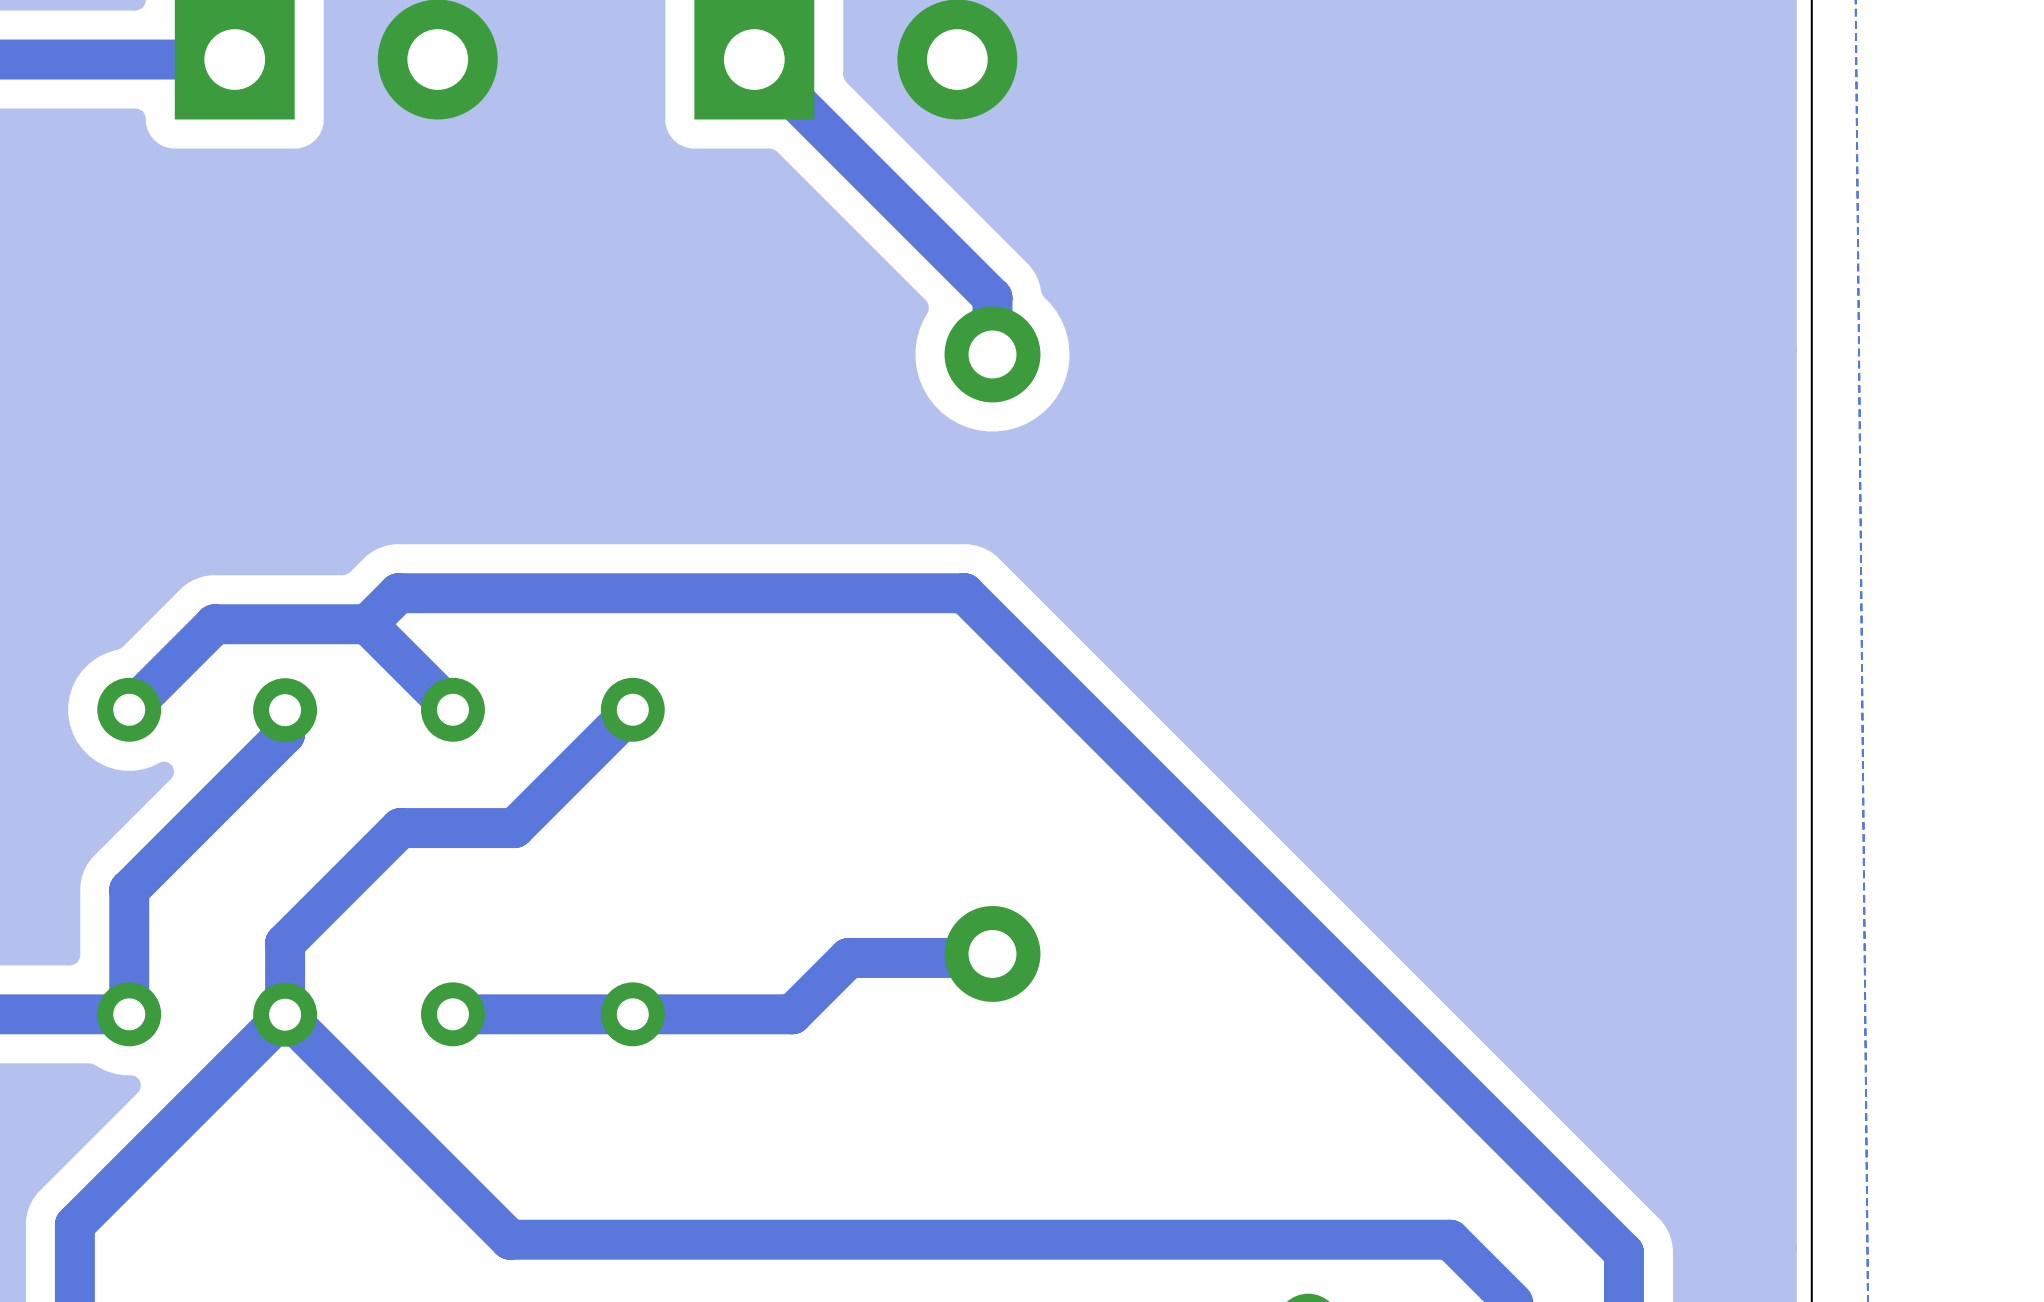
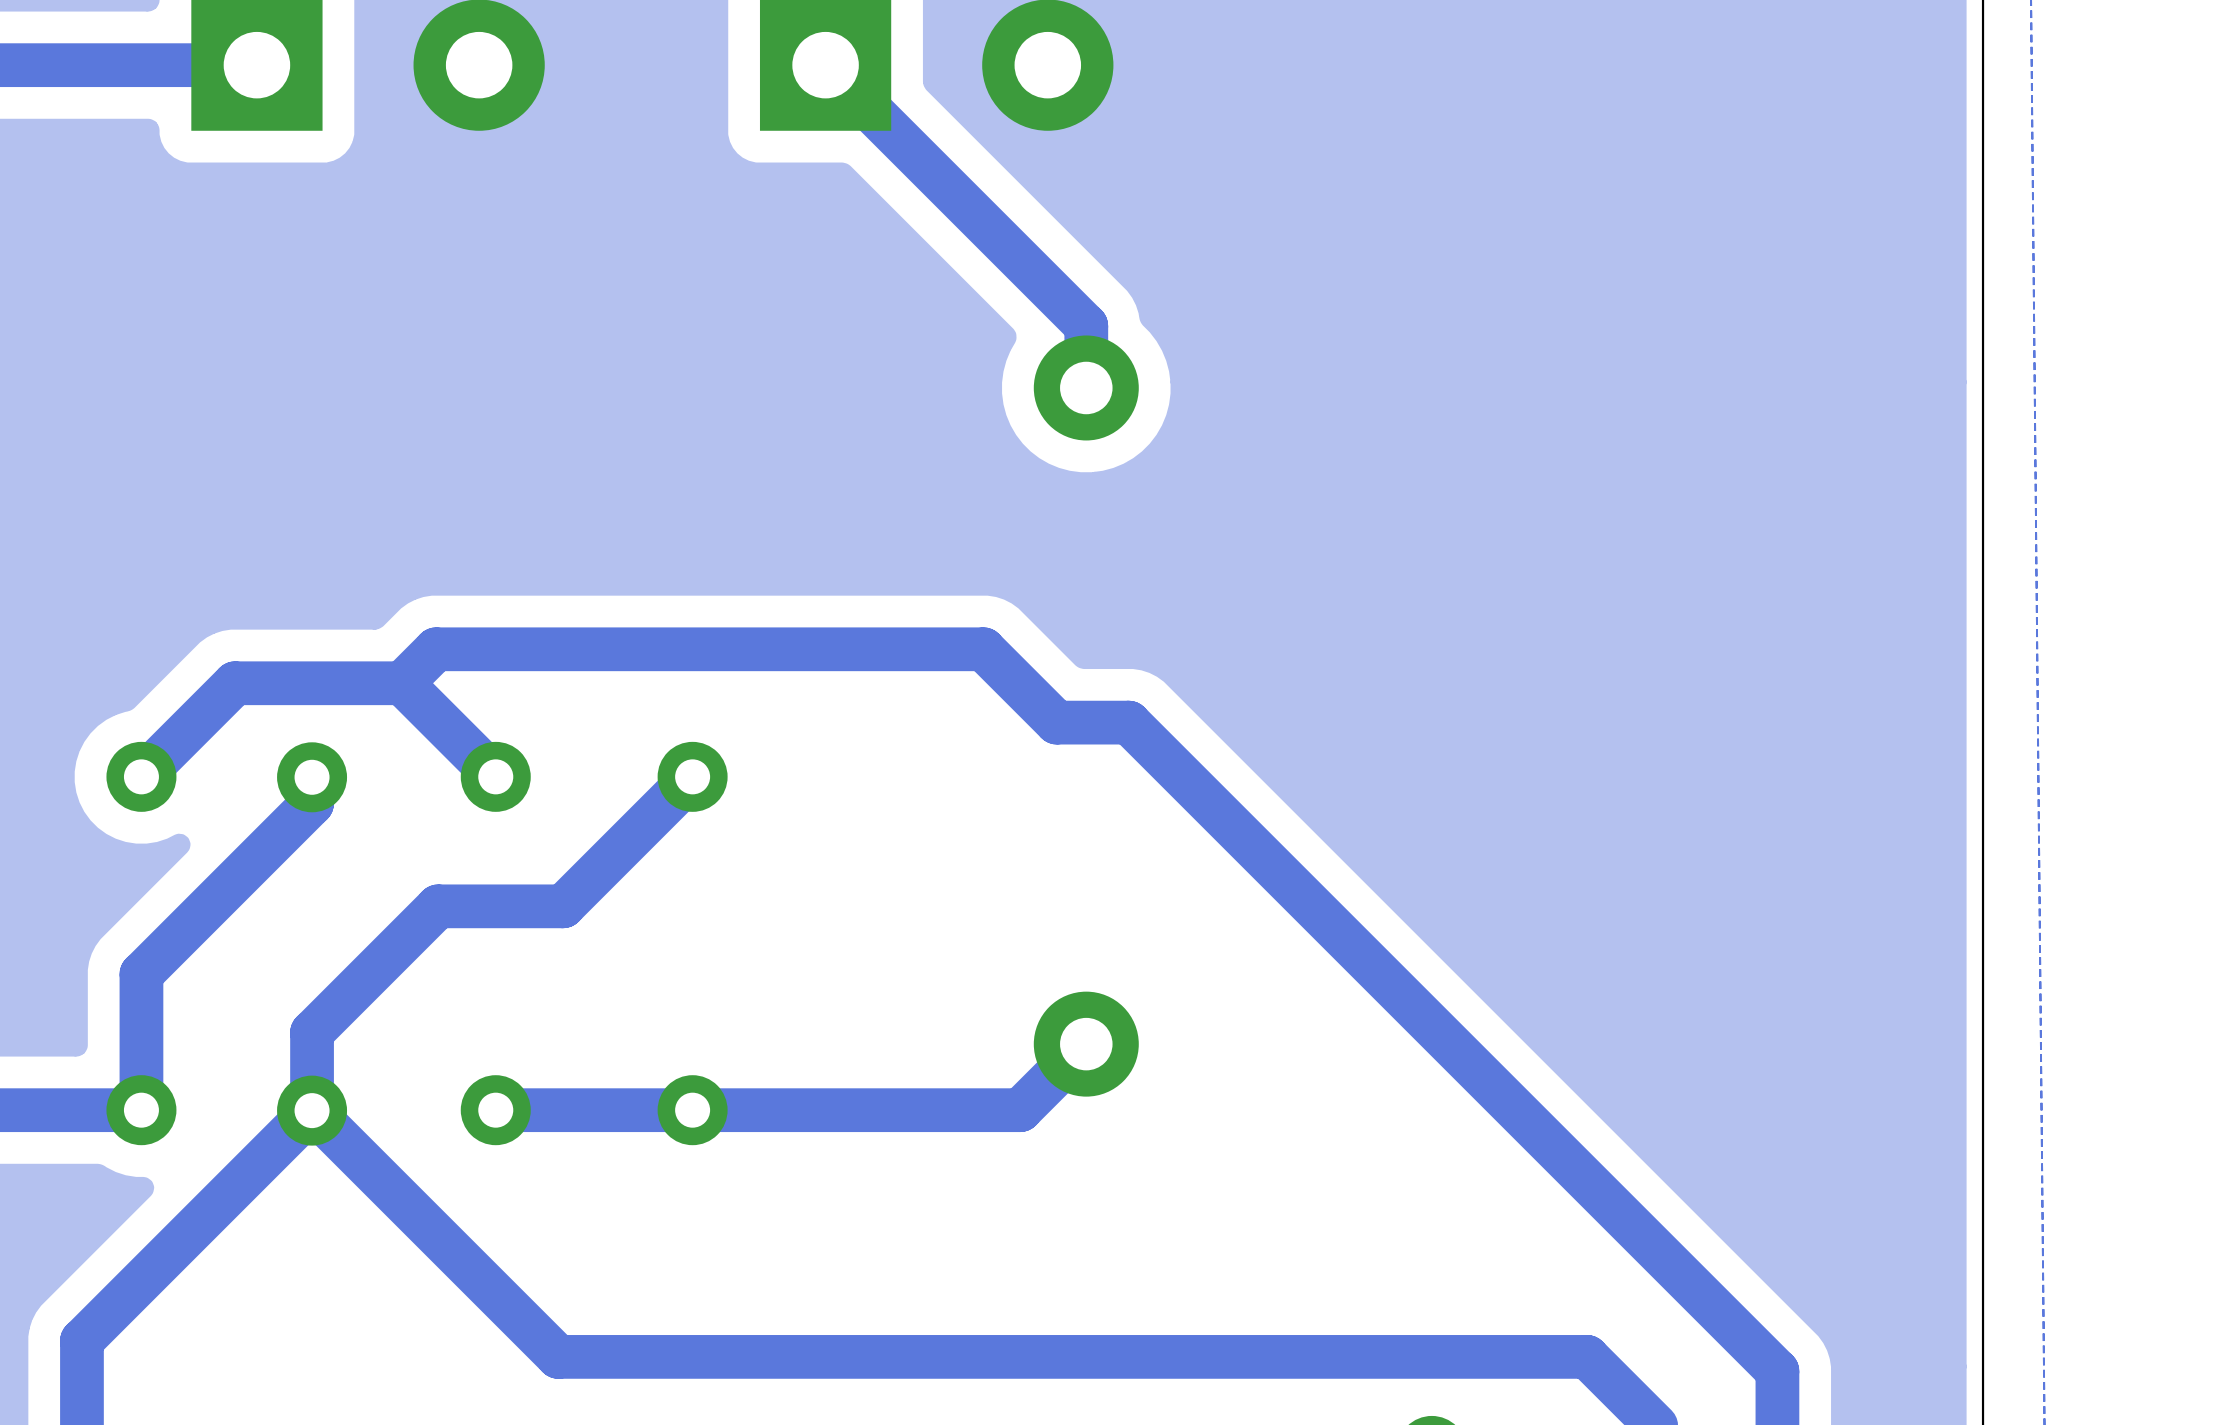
bottom track: (898, 593) (964, 593) (1031, 660) -> (983, 649) (1056, 722) (1128, 722)
bottom track: (988, 957) (848, 957) (792, 1014) -> (1081, 1048) (1020, 1110) (867, 1110)

